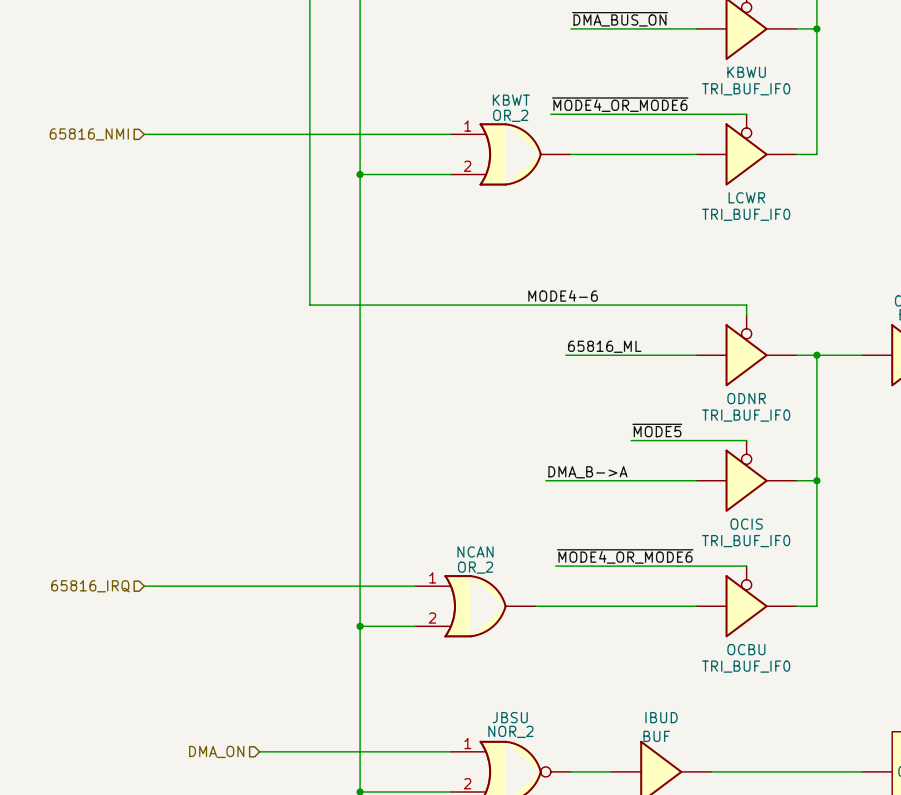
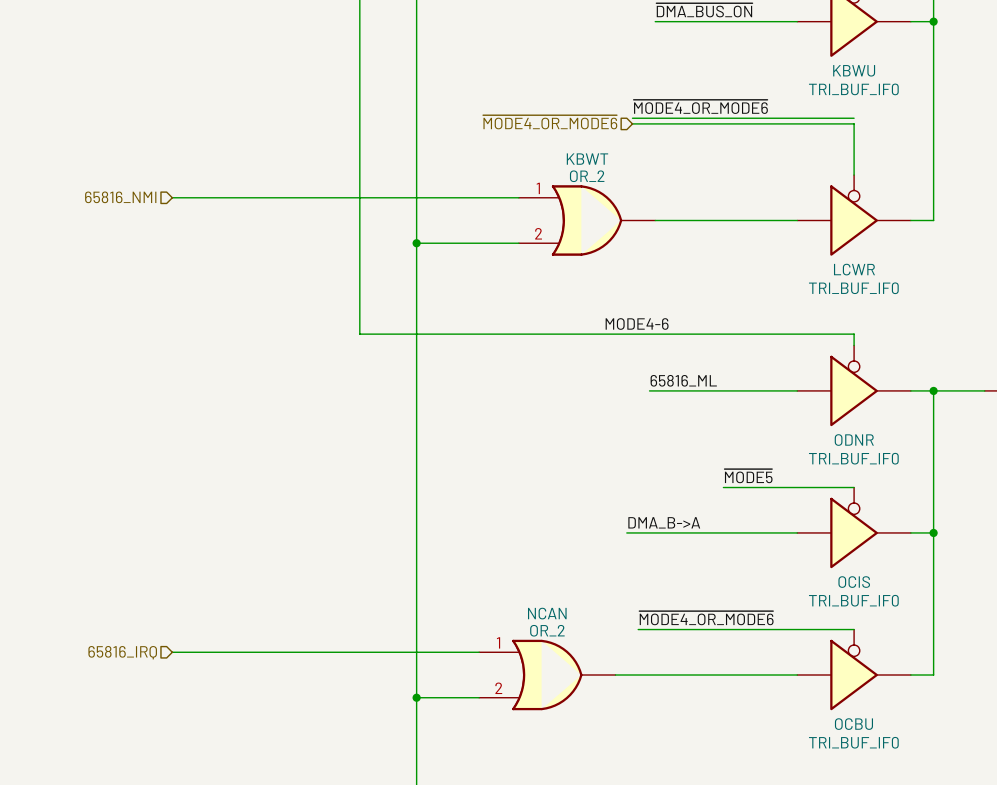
hierarchical label: none -> ~{MODE4_OR_MODE6} (550, 122)
wire: none -> (632, 123) (854, 123) (854, 175)
hierarchical label position: 65816_NMI (89, 134) -> 65816_NMI (120, 197)
wire: (144, 134) (450, 134) -> (172, 197) (518, 197)
LCWR position: (746, 149) -> (854, 215)
KBWT position: (510, 154) -> (587, 220)
wire: (570, 154) (696, 154) -> (655, 220) (797, 220)
wire: (796, 154) (816, 154) -> (910, 220) (933, 220) (933, 163)
wire: (360, 174) (450, 174) -> (416, 243) (518, 243)
junction: (360, 174) -> none
junction: none -> (416, 243)

